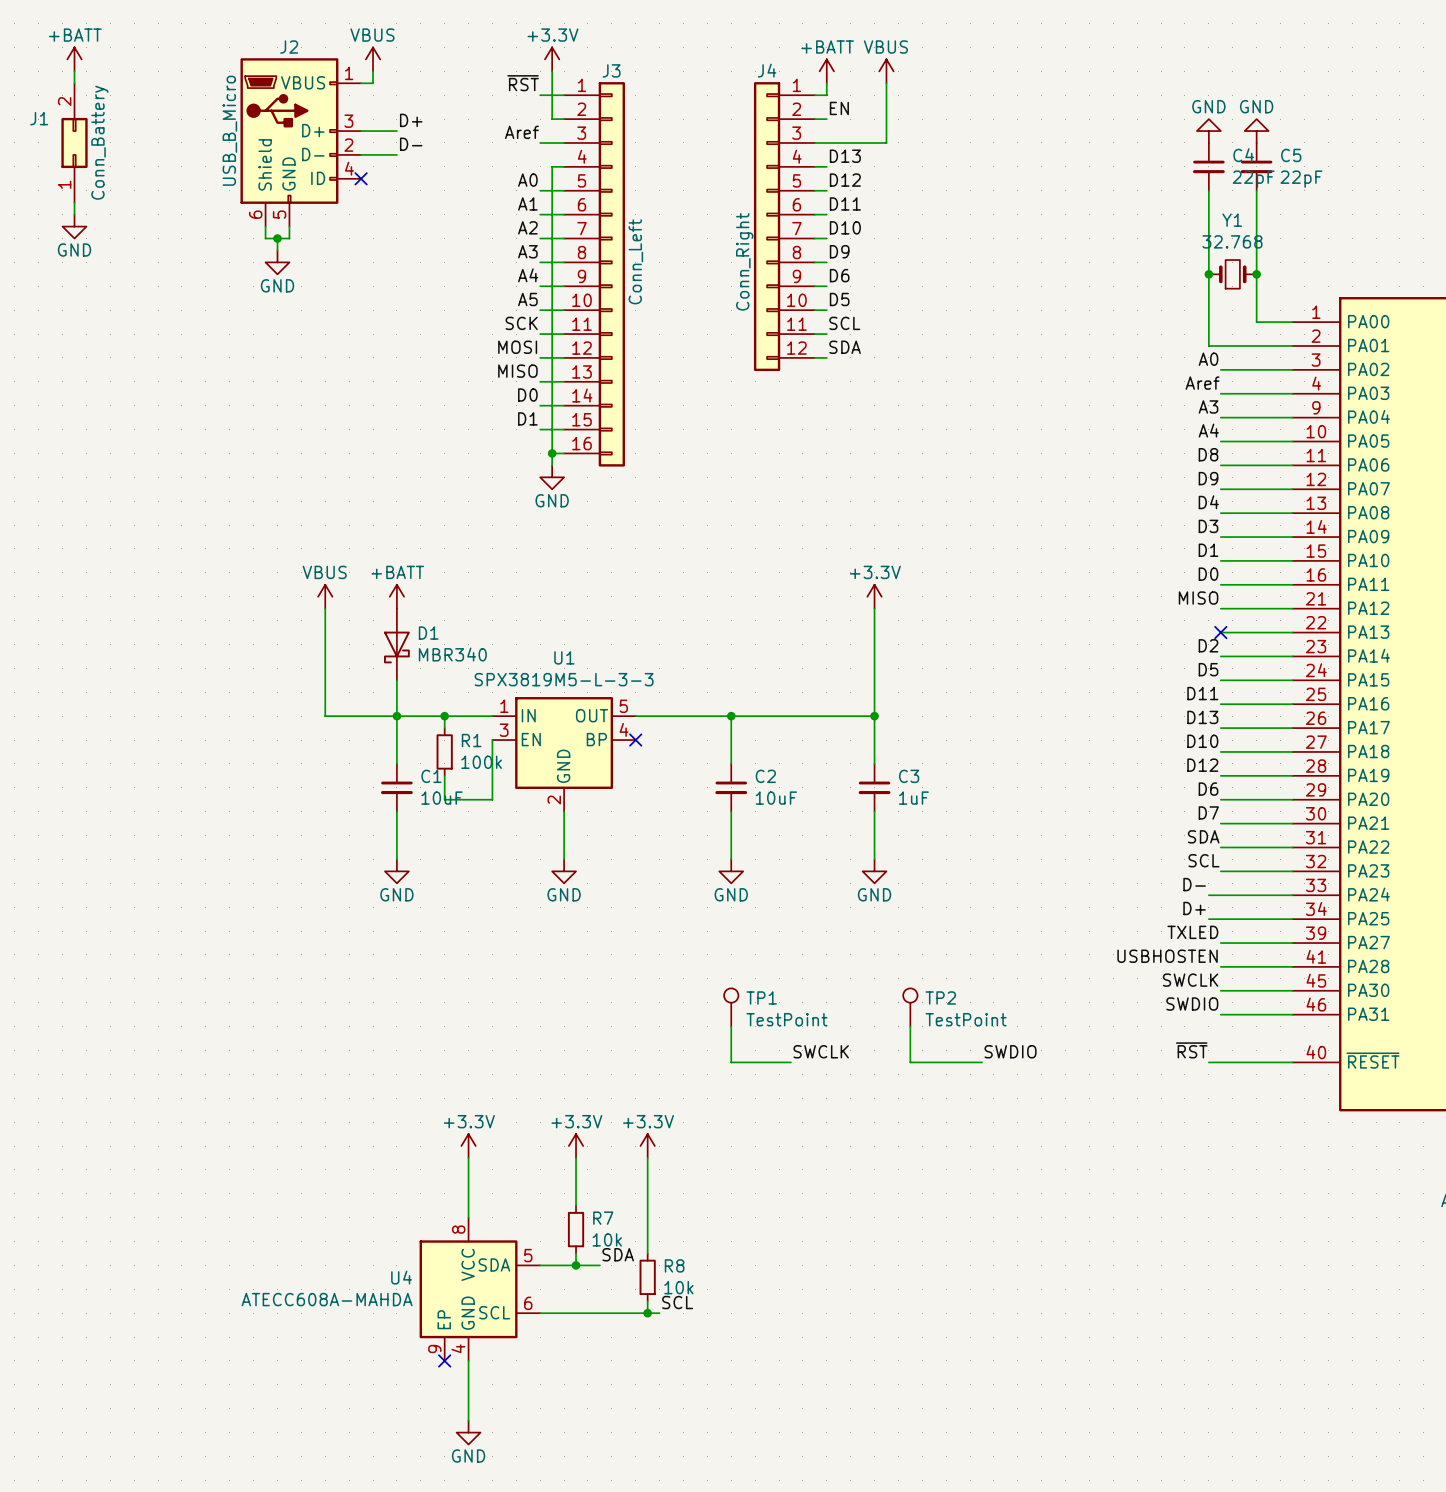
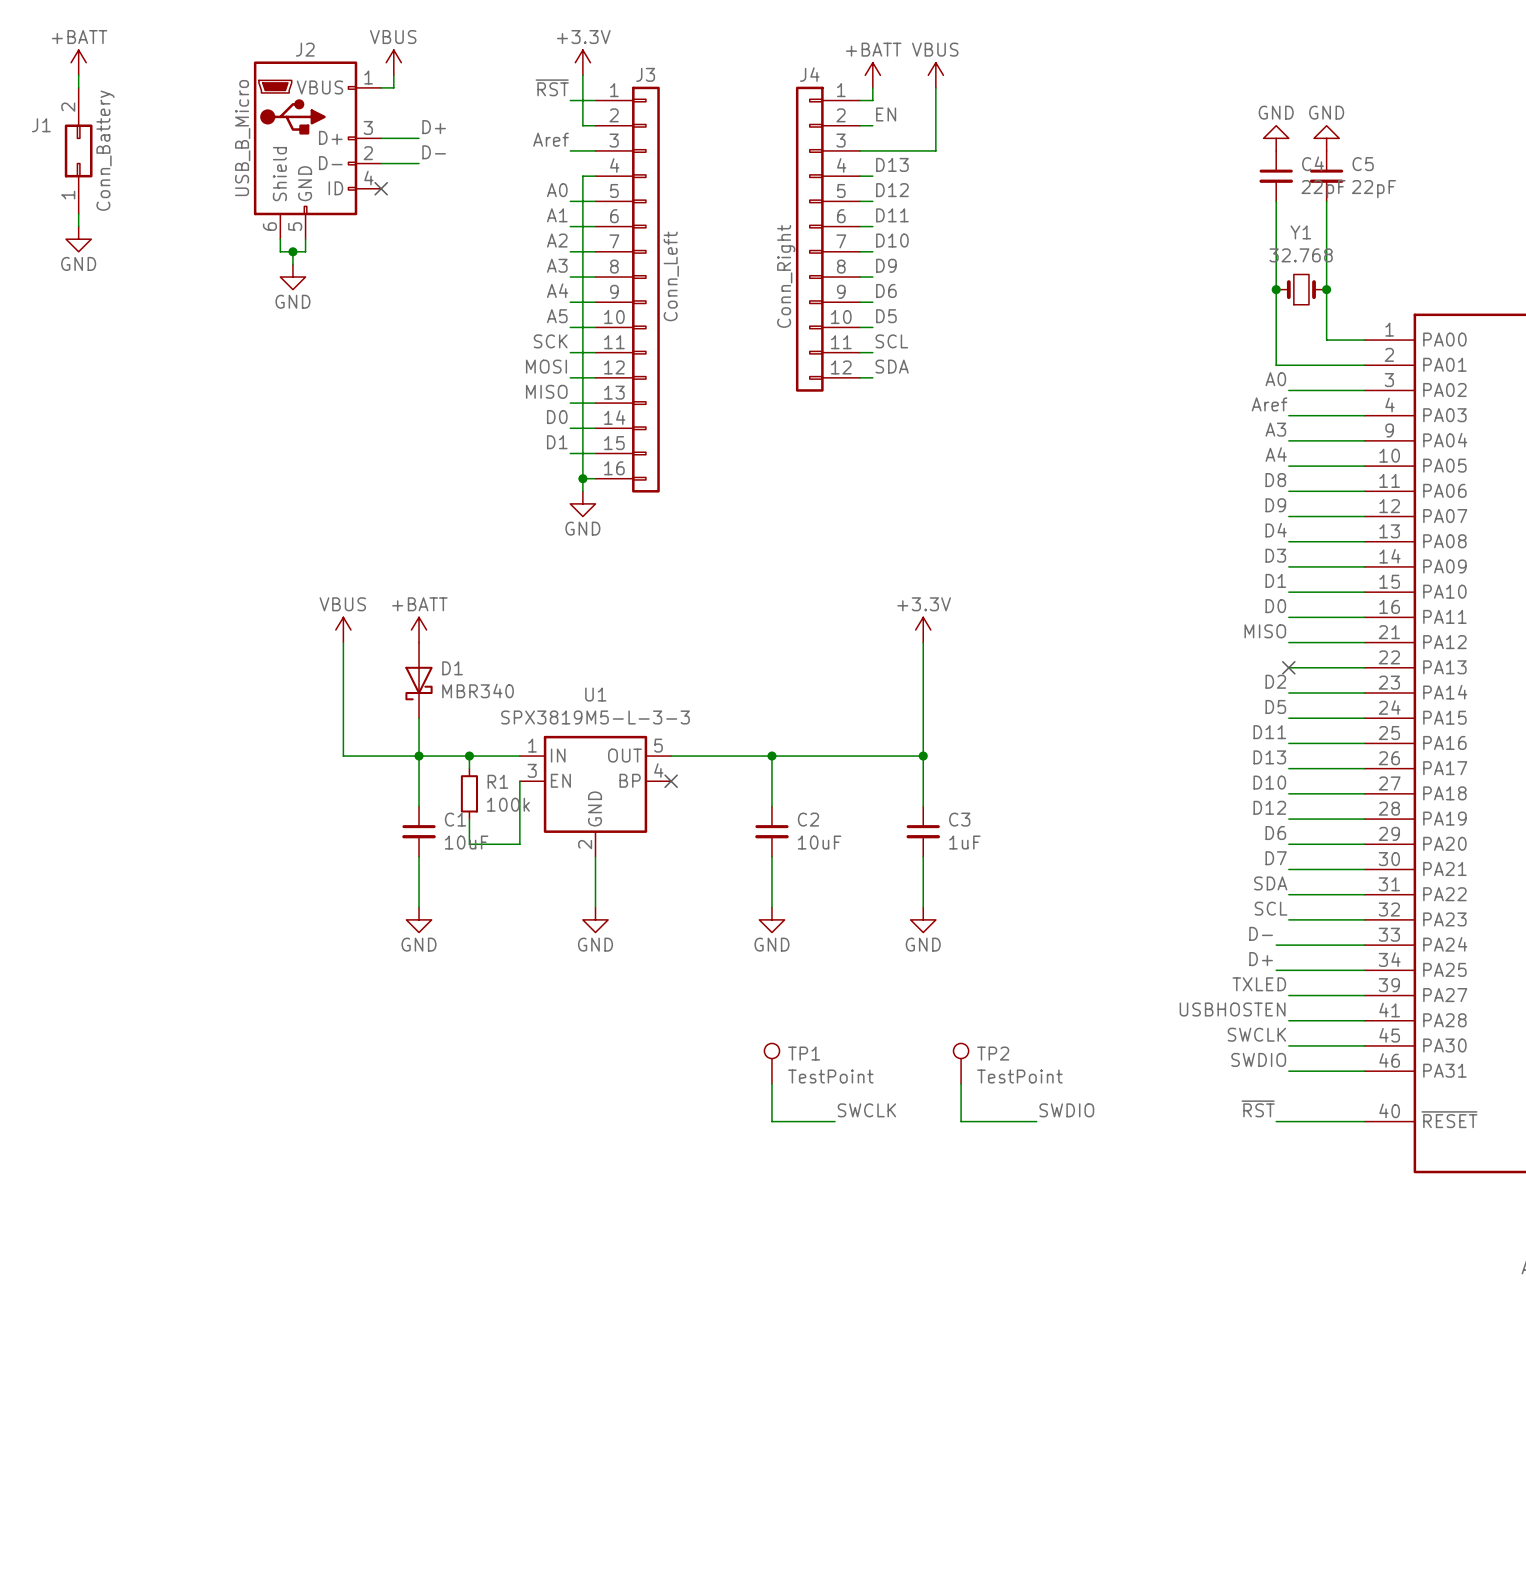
power symbol: +3.3V (468, 1146) -> none
power symbol: +3.3V (576, 1146) -> none
power symbol: +3.3V (647, 1146) -> none
wire: (468, 1157) (468, 1217) -> none
wire: (576, 1157) (576, 1205) -> none
wire: (647, 1157) (647, 1253) -> none
R7: 10k (576, 1229) -> none
wire: (576, 1253) (576, 1265) -> none
label: SDA (618, 1254) -> none
wire: (540, 1265) (599, 1265) -> none
junction: (576, 1265) -> none
R8: 10k (647, 1277) -> none
U4: ATECC608A-MAHDA (479, 1289) -> none
wire: (647, 1301) (647, 1313) -> none
label: SCL (677, 1302) -> none
wire: (540, 1313) (659, 1313) -> none
junction: (647, 1313) -> none
no-connect mark: (444, 1360) -> none
wire: (468, 1360) (468, 1420) -> none
power symbol: GND (468, 1432) -> none

